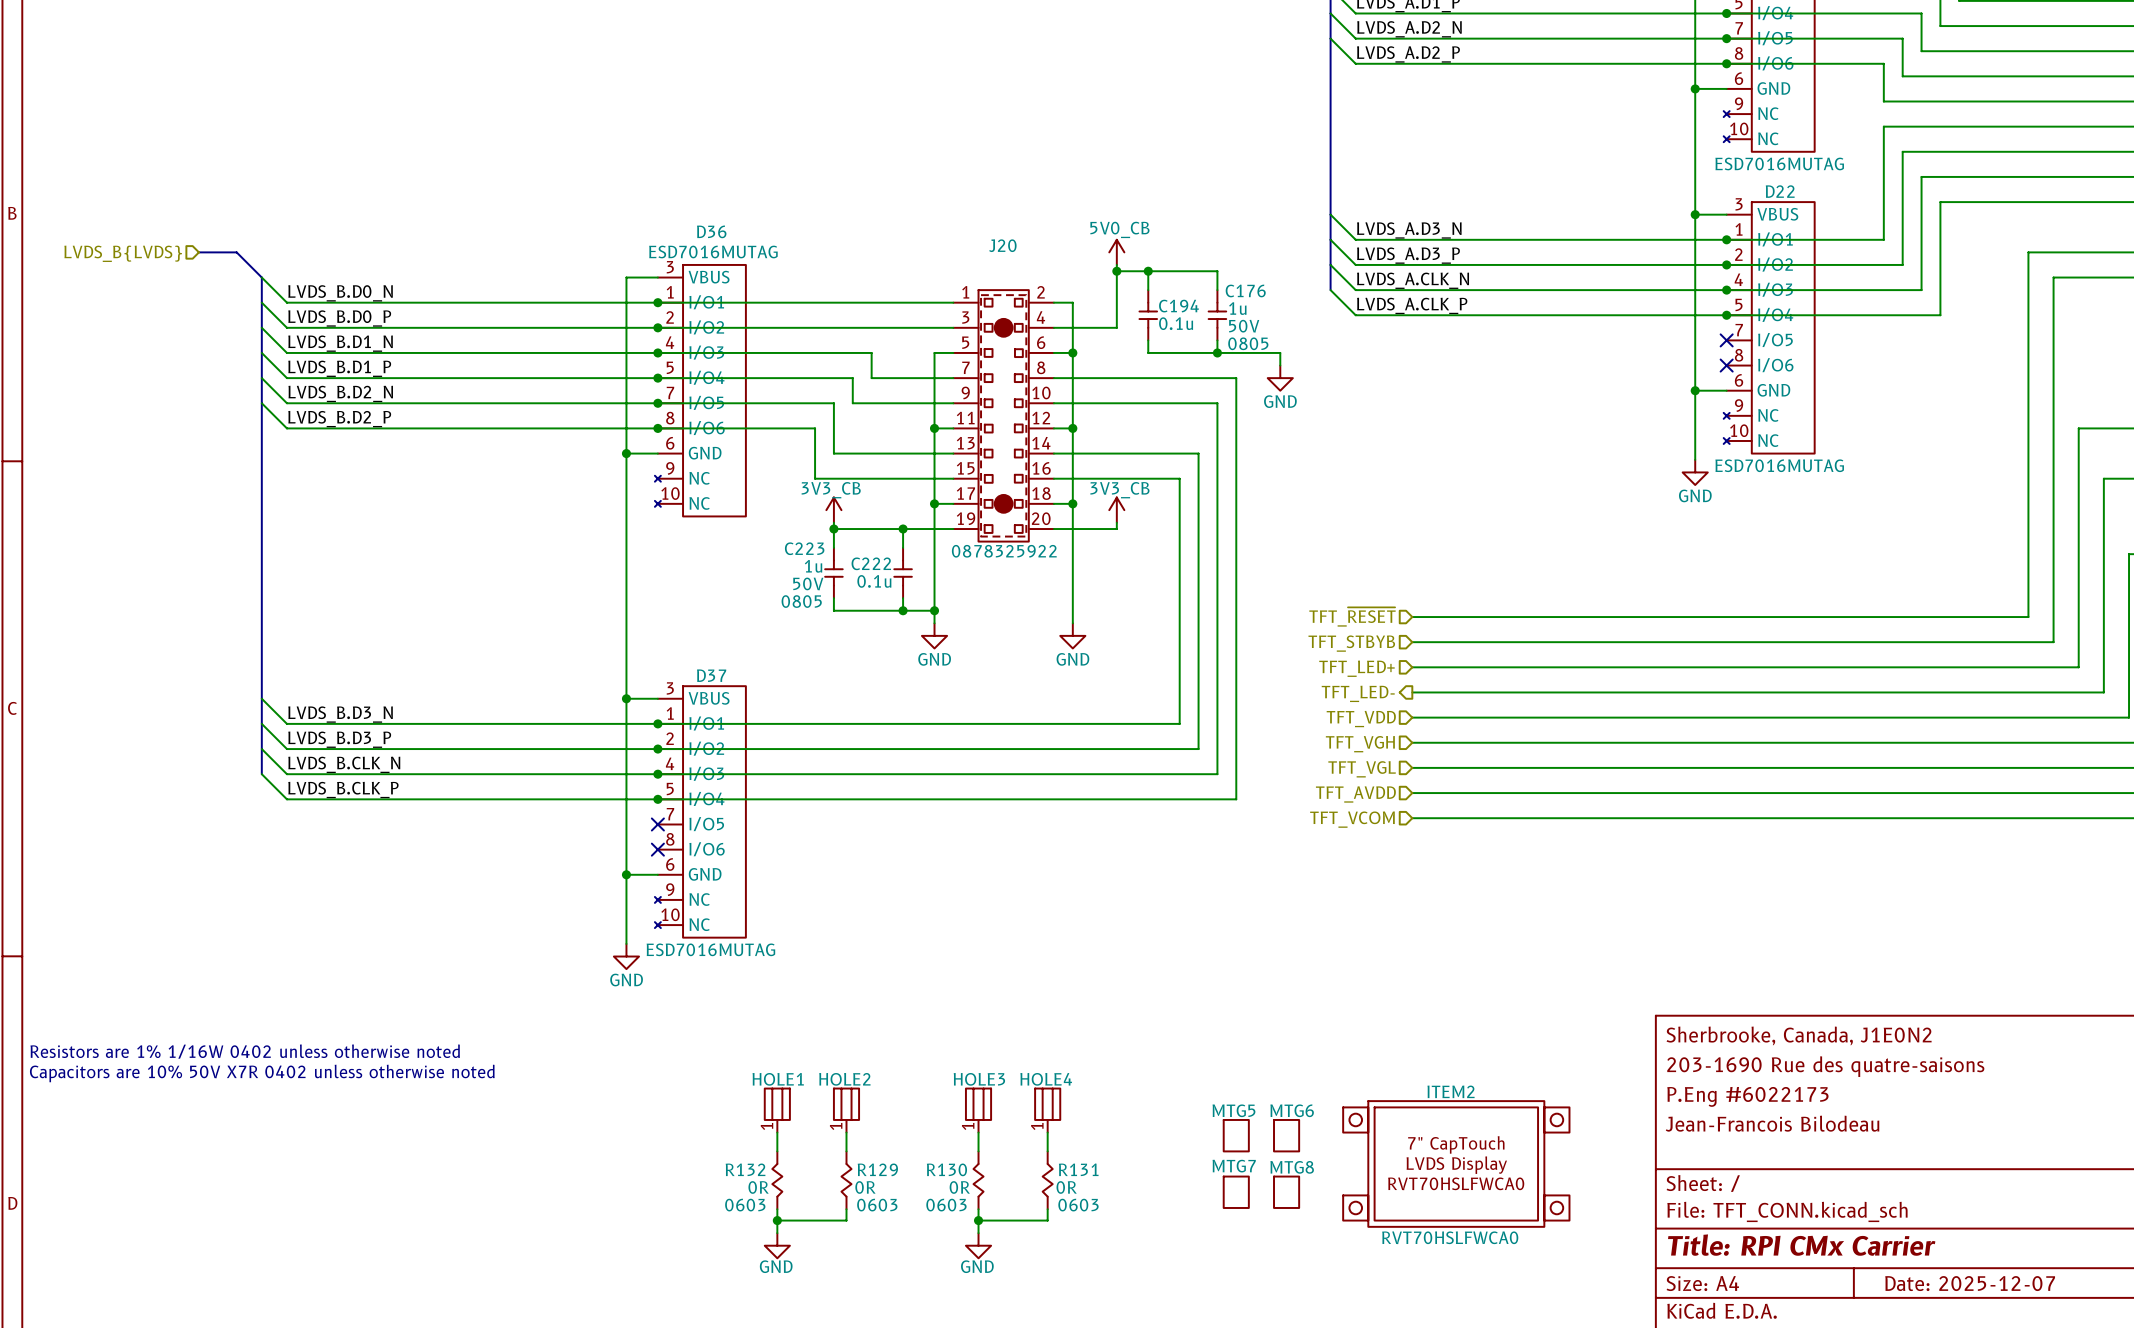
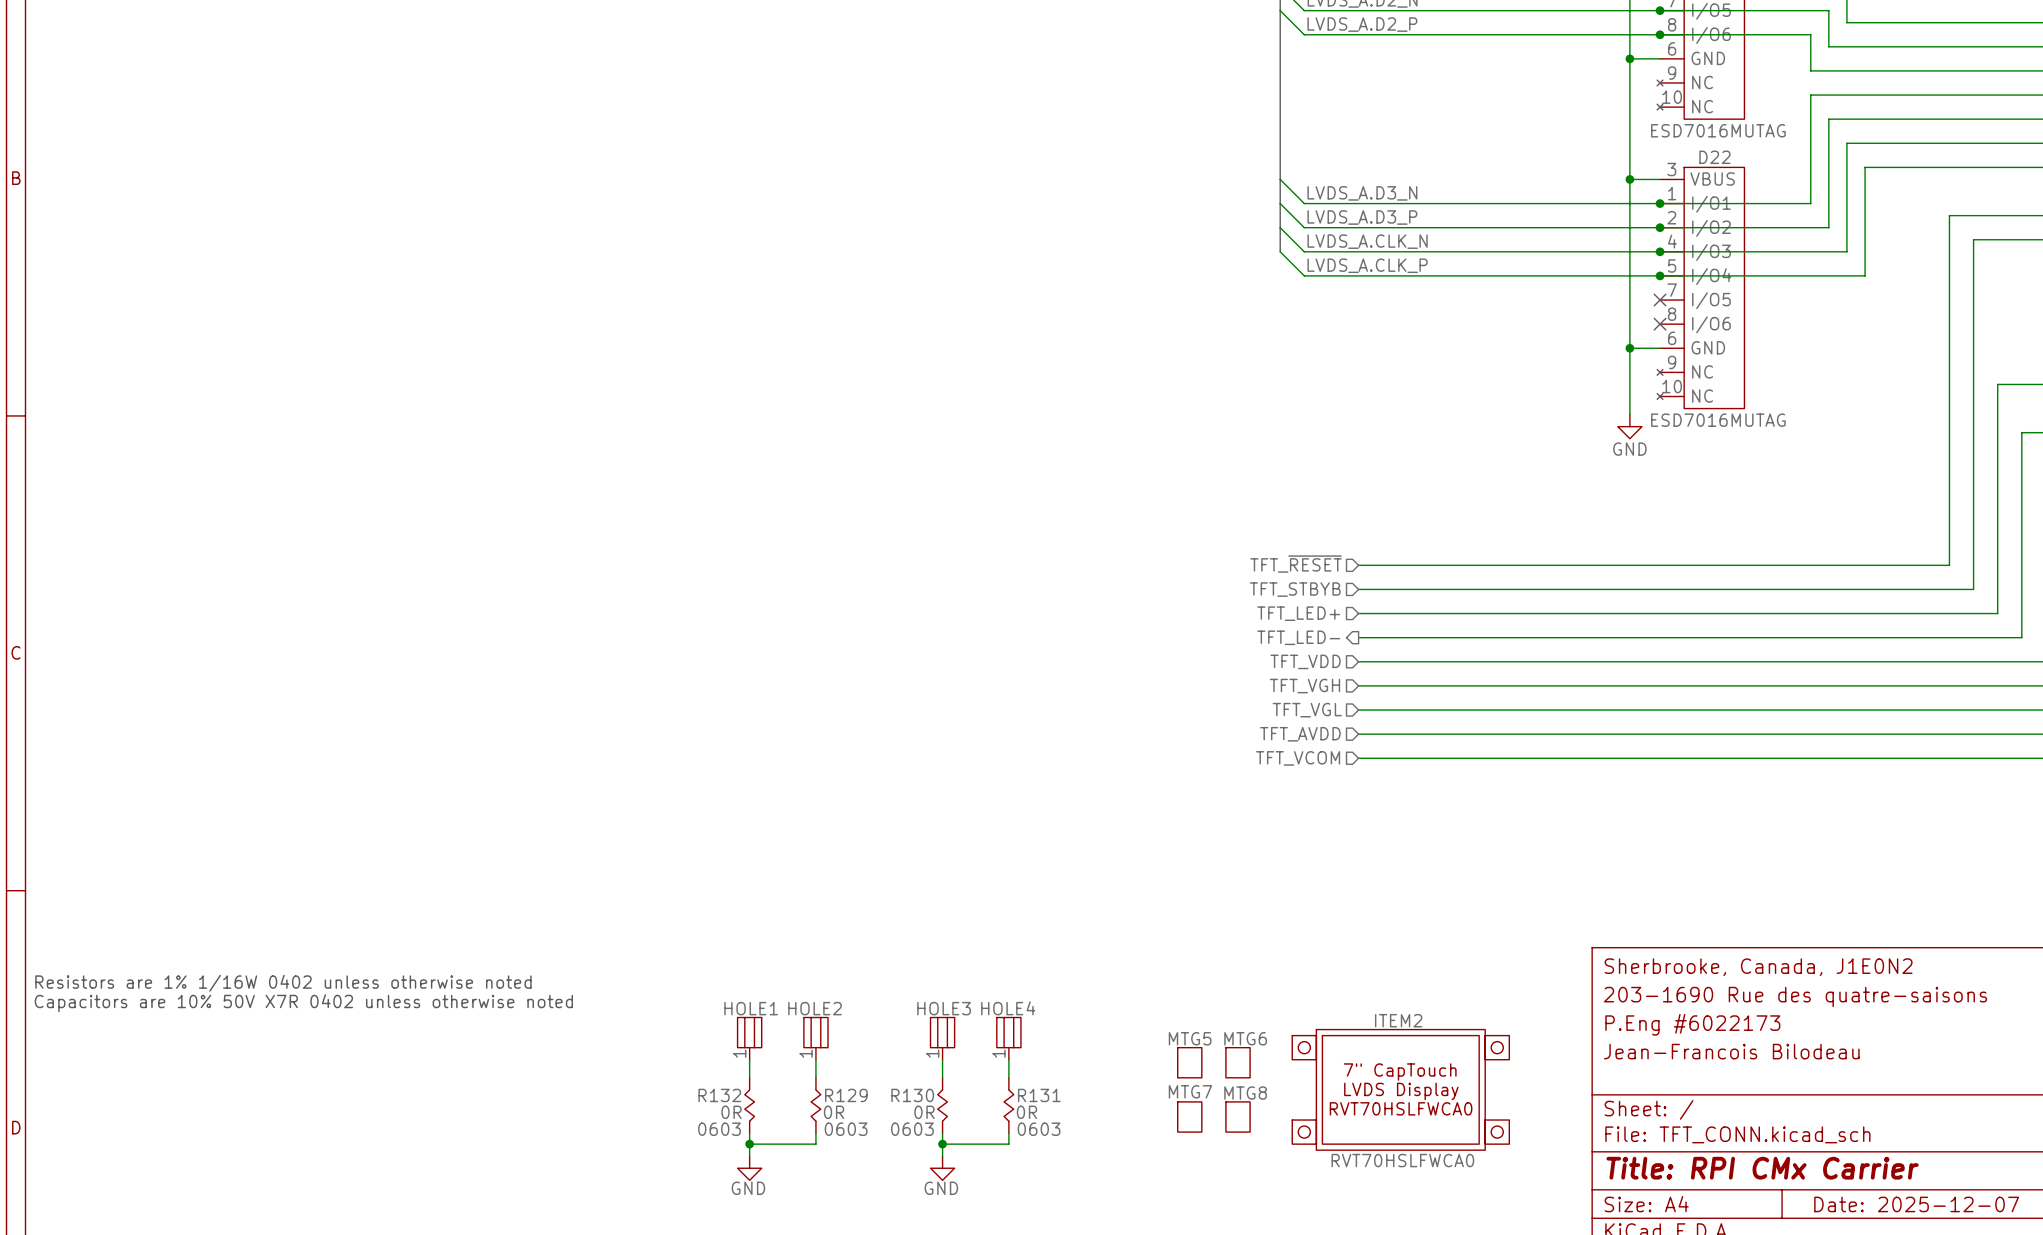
bus: (198, 252) (236, 252) (261, 277) (261, 774) -> none
power symbol: 5V0_CB (1116, 252) -> none
hierarchical label: LVDS_B{LVDS} (123, 253) -> none
wire: (1116, 264) (1116, 327) (1053, 327) -> none
wire: (1116, 271) (1217, 271) (1217, 290) -> none
junction: (1116, 271) -> none
wire: (1148, 271) (1148, 290) -> none
junction: (1148, 271) -> none
wire: (261, 277) (286, 302) (953, 302) -> none
wire: (657, 277) (626, 277) (626, 698) -> none
label: LVDS_B.D0_N (340, 293) -> none
wire: (261, 302) (286, 327) (953, 327) -> none
junction: (657, 302) -> none
wire: (1053, 302) (1072, 302) (1072, 623) -> none
C194: 0.1u (1148, 315) -> none
C176: 1u (1217, 315) -> none
label: LVDS_B.D0_P (339, 318) -> none
wire: (261, 327) (286, 352) (871, 352) (871, 378) (953, 378) -> none
junction: (657, 327) -> none
wire: (1148, 340) (1148, 352) (1280, 352) (1280, 365) -> none
wire: (1217, 340) (1217, 352) -> none
label: LVDS_B.D1_N (340, 343) -> none
wire: (261, 352) (286, 378) (852, 378) (852, 403) (953, 403) -> none
junction: (657, 352) -> none
wire: (953, 352) (934, 352) (934, 623) -> none
wire: (1053, 352) (1072, 352) -> none
junction: (1072, 352) -> none
junction: (1217, 352) -> none
label: LVDS_B.D1_P (339, 368) -> none
wire: (261, 378) (286, 403) (833, 403) (833, 453) (953, 453) -> none
junction: (657, 378) -> none
wire: (1053, 378) (1236, 378) (1236, 799) (286, 799) -> none
power symbol: GND (1280, 378) -> none
D36: ESD7016MUTAG (700, 390) -> none
label: LVDS_B.D2_N (340, 393) -> none
wire: (261, 403) (286, 428) (815, 428) (815, 478) (953, 478) -> none
junction: (657, 403) -> none
wire: (1053, 403) (1217, 403) (1217, 774) (286, 774) (261, 749) -> none
J20: 0878325922 (1003, 415) -> none
label: LVDS_B.D2_P (339, 419) -> none
junction: (657, 428) -> none
wire: (934, 428) (953, 428) -> none
junction: (934, 428) -> none
wire: (1053, 428) (1072, 428) -> none
junction: (1072, 428) -> none
wire: (626, 453) (657, 453) -> none
junction: (626, 453) -> none
wire: (1053, 453) (1198, 453) (1198, 749) (286, 749) (261, 723) -> none
wire: (1053, 478) (1179, 478) (1179, 723) (286, 723) (261, 698) -> none
wire: (934, 503) (953, 503) -> none
junction: (934, 503) -> none
wire: (1053, 503) (1072, 503) -> none
junction: (1072, 503) -> none
power symbol: 3V3_CB (833, 510) -> none
power symbol: 3V3_CB (1116, 510) -> none
wire: (833, 522) (833, 547) -> none
wire: (1116, 522) (1116, 529) (1053, 529) -> none
wire: (833, 529) (953, 529) -> none
junction: (833, 529) -> none
wire: (903, 529) (903, 547) -> none
junction: (903, 529) -> none
C223: 1u (833, 573) -> none
C222: 0.1u (903, 573) -> none
wire: (833, 598) (833, 610) (934, 610) -> none
wire: (903, 598) (903, 610) -> none
junction: (903, 610) -> none
junction: (934, 610) -> none
power symbol: GND (934, 635) -> none
power symbol: GND (1072, 635) -> none
wire: (626, 698) (626, 943) -> none
wire: (626, 698) (657, 698) -> none
junction: (626, 698) -> none
label: LVDS_B.D3_N (340, 714) -> none
junction: (657, 723) -> none
label: LVDS_B.D3_P (339, 739) -> none
junction: (657, 749) -> none
label: LVDS_B.CLK_N (344, 764) -> none
wire: (261, 774) (286, 799) -> none
junction: (657, 774) -> none
label: LVDS_B.CLK_P (343, 790) -> none
junction: (657, 799) -> none
D37: ESD7016MUTAG (700, 811) -> none
no-connect mark: (657, 824) -> none
no-connect mark: (657, 849) -> none
wire: (626, 874) (657, 874) -> none
junction: (626, 874) -> none
power symbol: GND (626, 956) -> none

